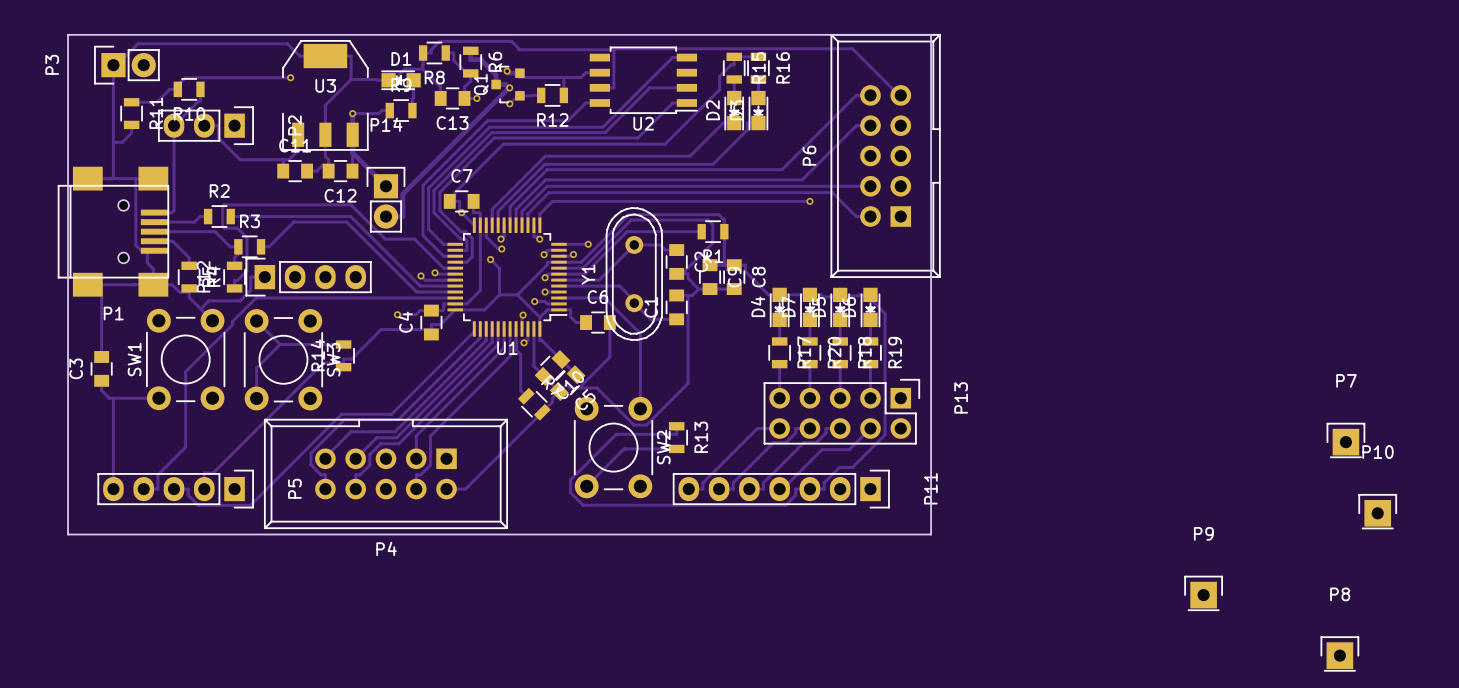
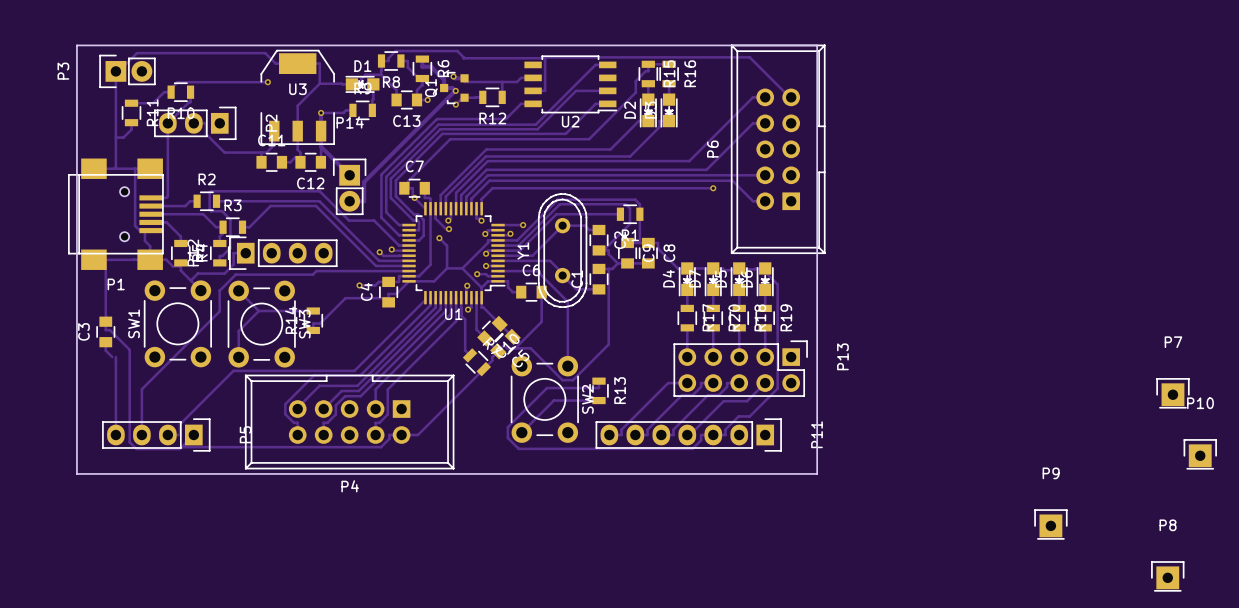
track: (347, 297) (256, 297) (185, 371) (185, 447) (157, 474) (157, 489) (143, 489) -> (316, 271) (312, 274) (235, 274) (219, 290) (219, 311) (141, 389) (141, 435)
track: (343, 363) (323, 363) (213, 473) (204, 473) (204, 489) -> (105, 321) (105, 330) (110, 330) (129, 349) (129, 442) (136, 449) (179, 449) (193, 435)
track: (109, 398) (158, 398) -> none
track: (341, 414) (250, 505) (198, 505) (188, 495) (188, 489) -> (311, 370) (233, 370) (180, 424) (180, 435)
P5 footprint: [97, 469, 254, 509] -> [102, 418, 211, 452]
track: none -> (401, 435) (389, 435) (389, 438) (381, 447) (181, 446)

